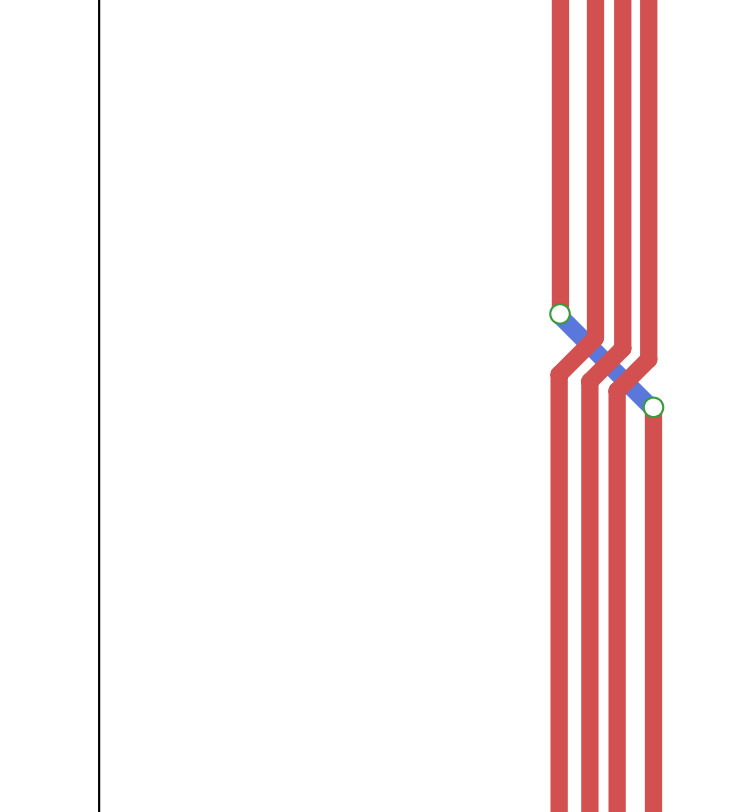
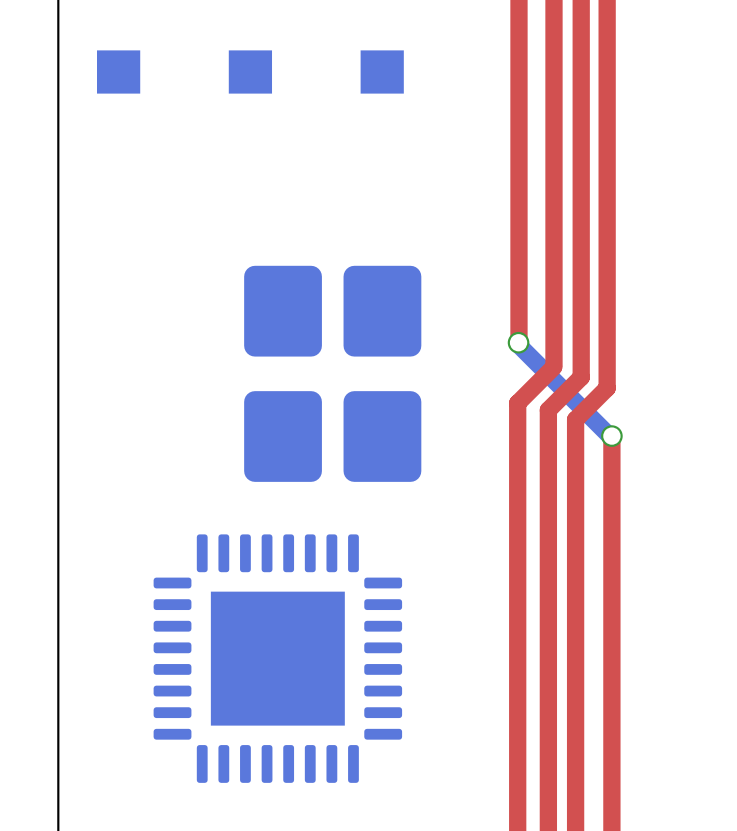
part: none -> (118, 71)
part: none -> (250, 71)
part: none -> (382, 71)
part: none -> (332, 373)
part: none -> (277, 658)

